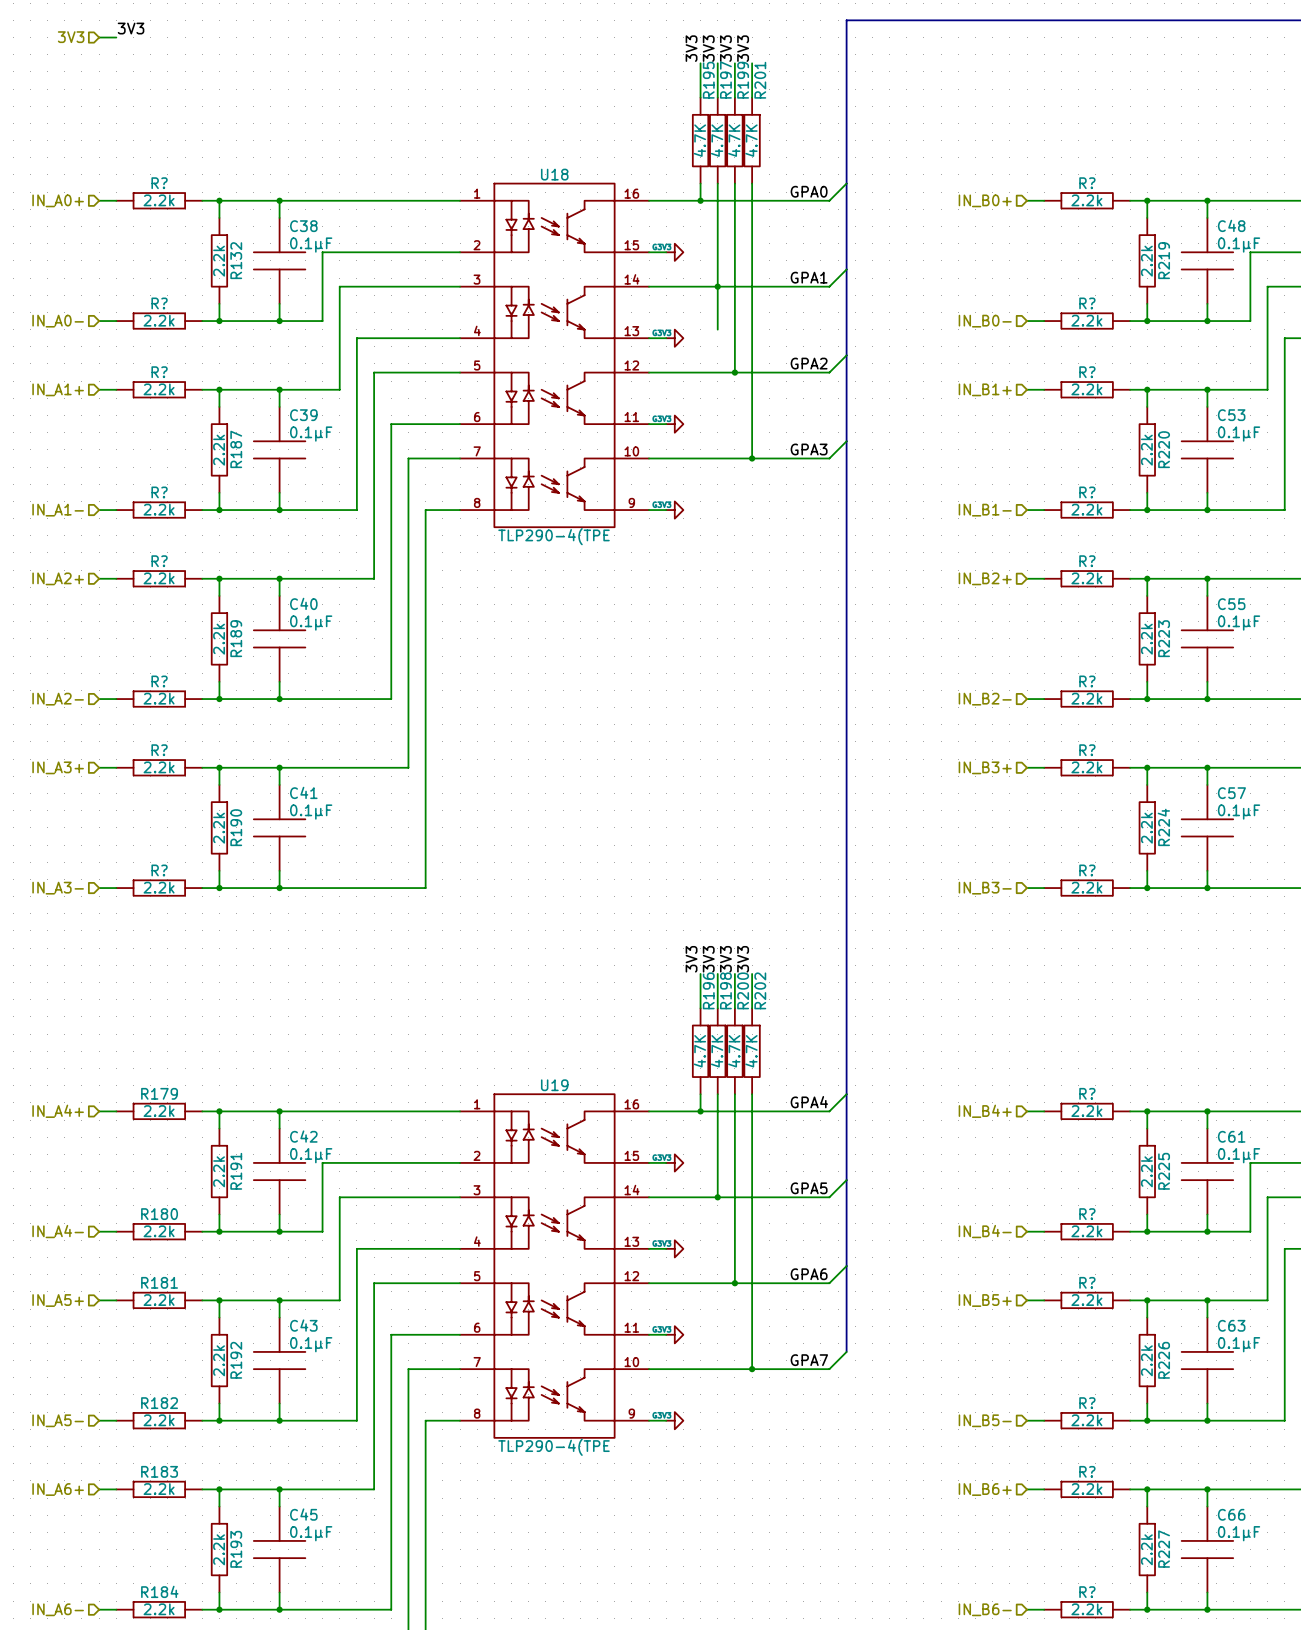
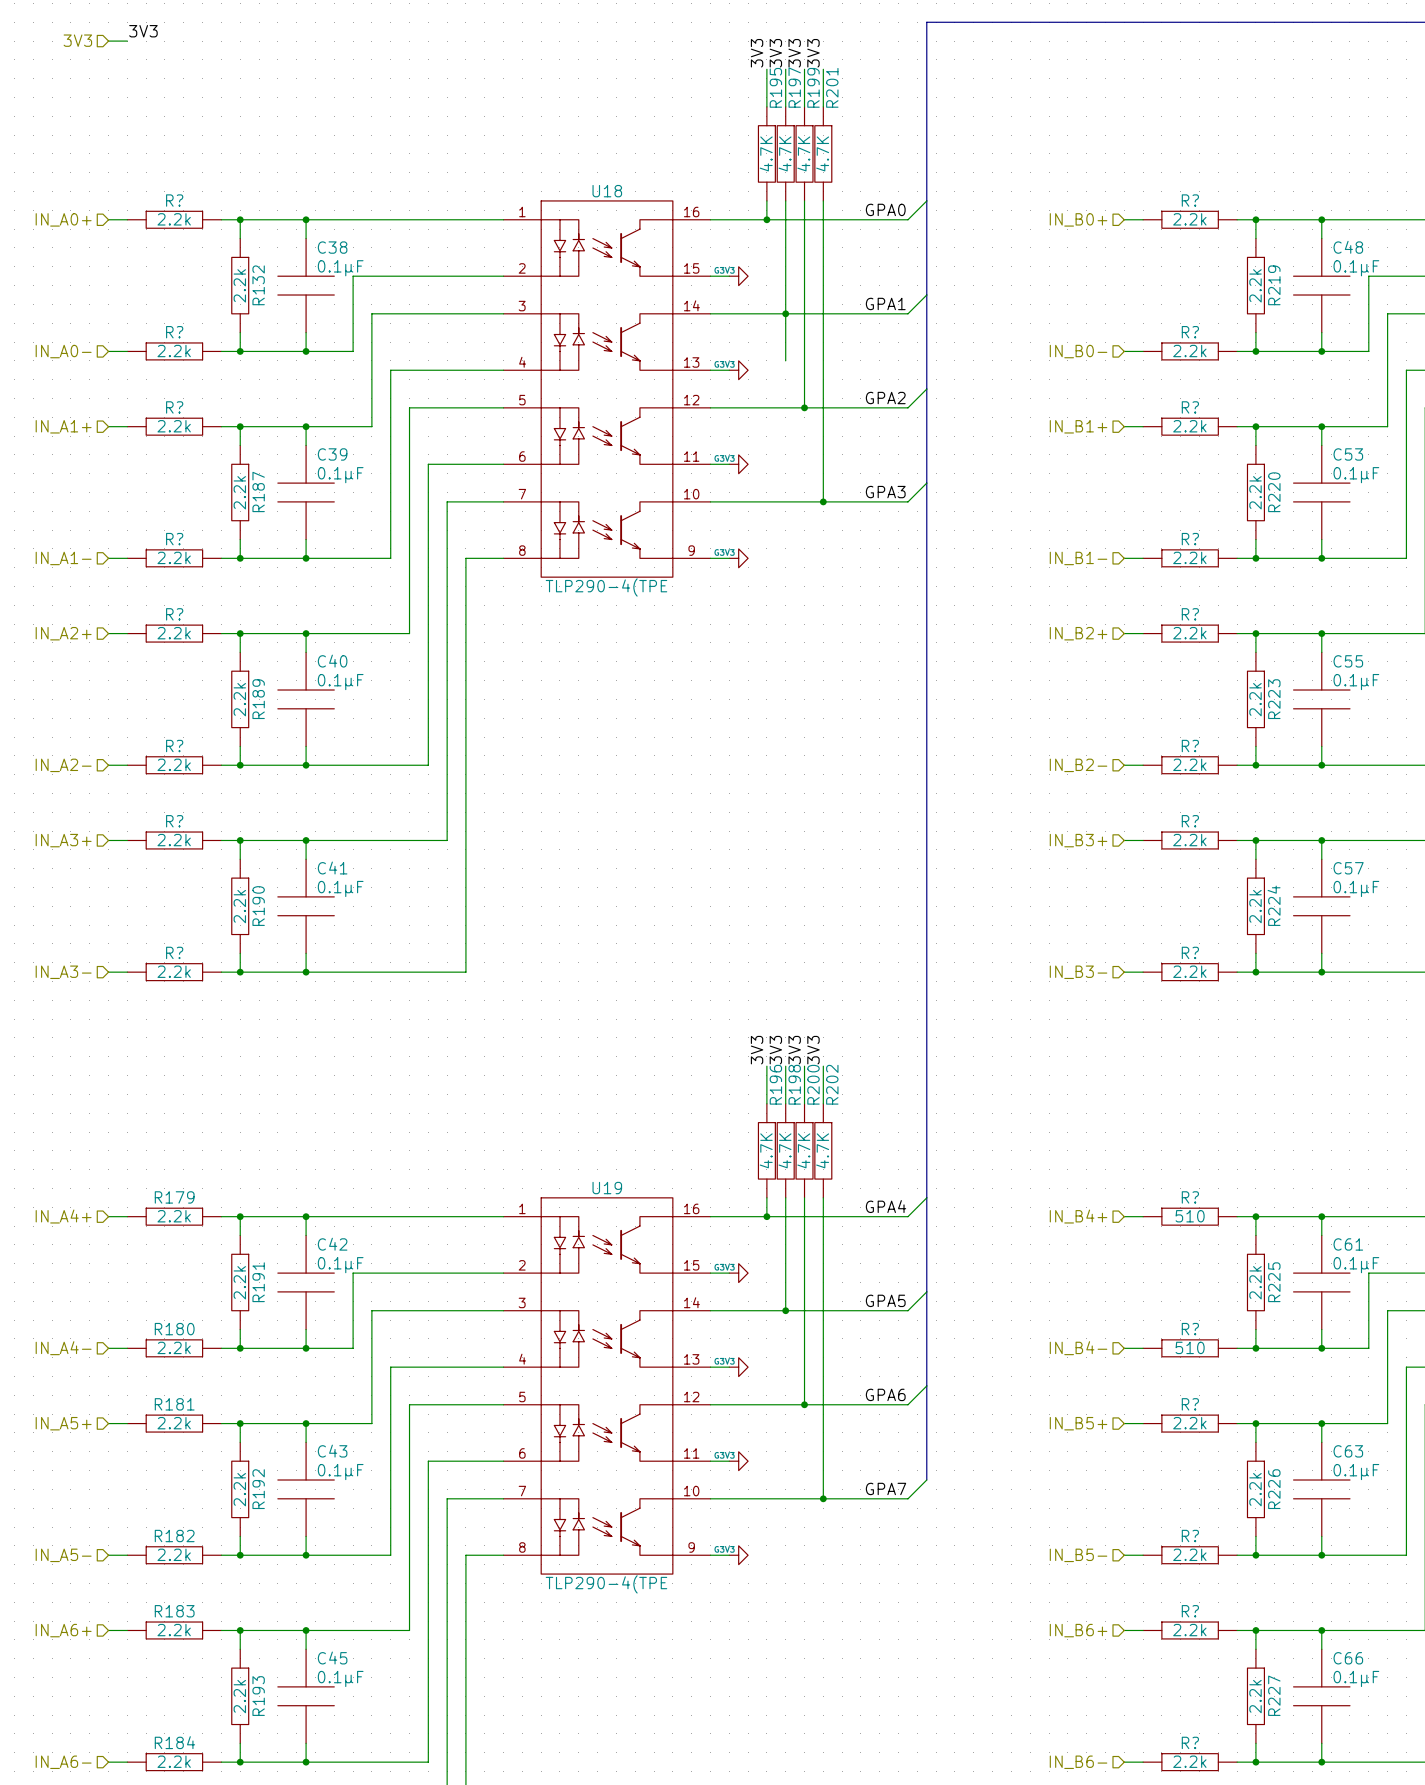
R? text: 2.2k (1086, 1111) -> 510 (1190, 1216)
R? text: 2.2k (1086, 1231) -> 510 (1190, 1347)

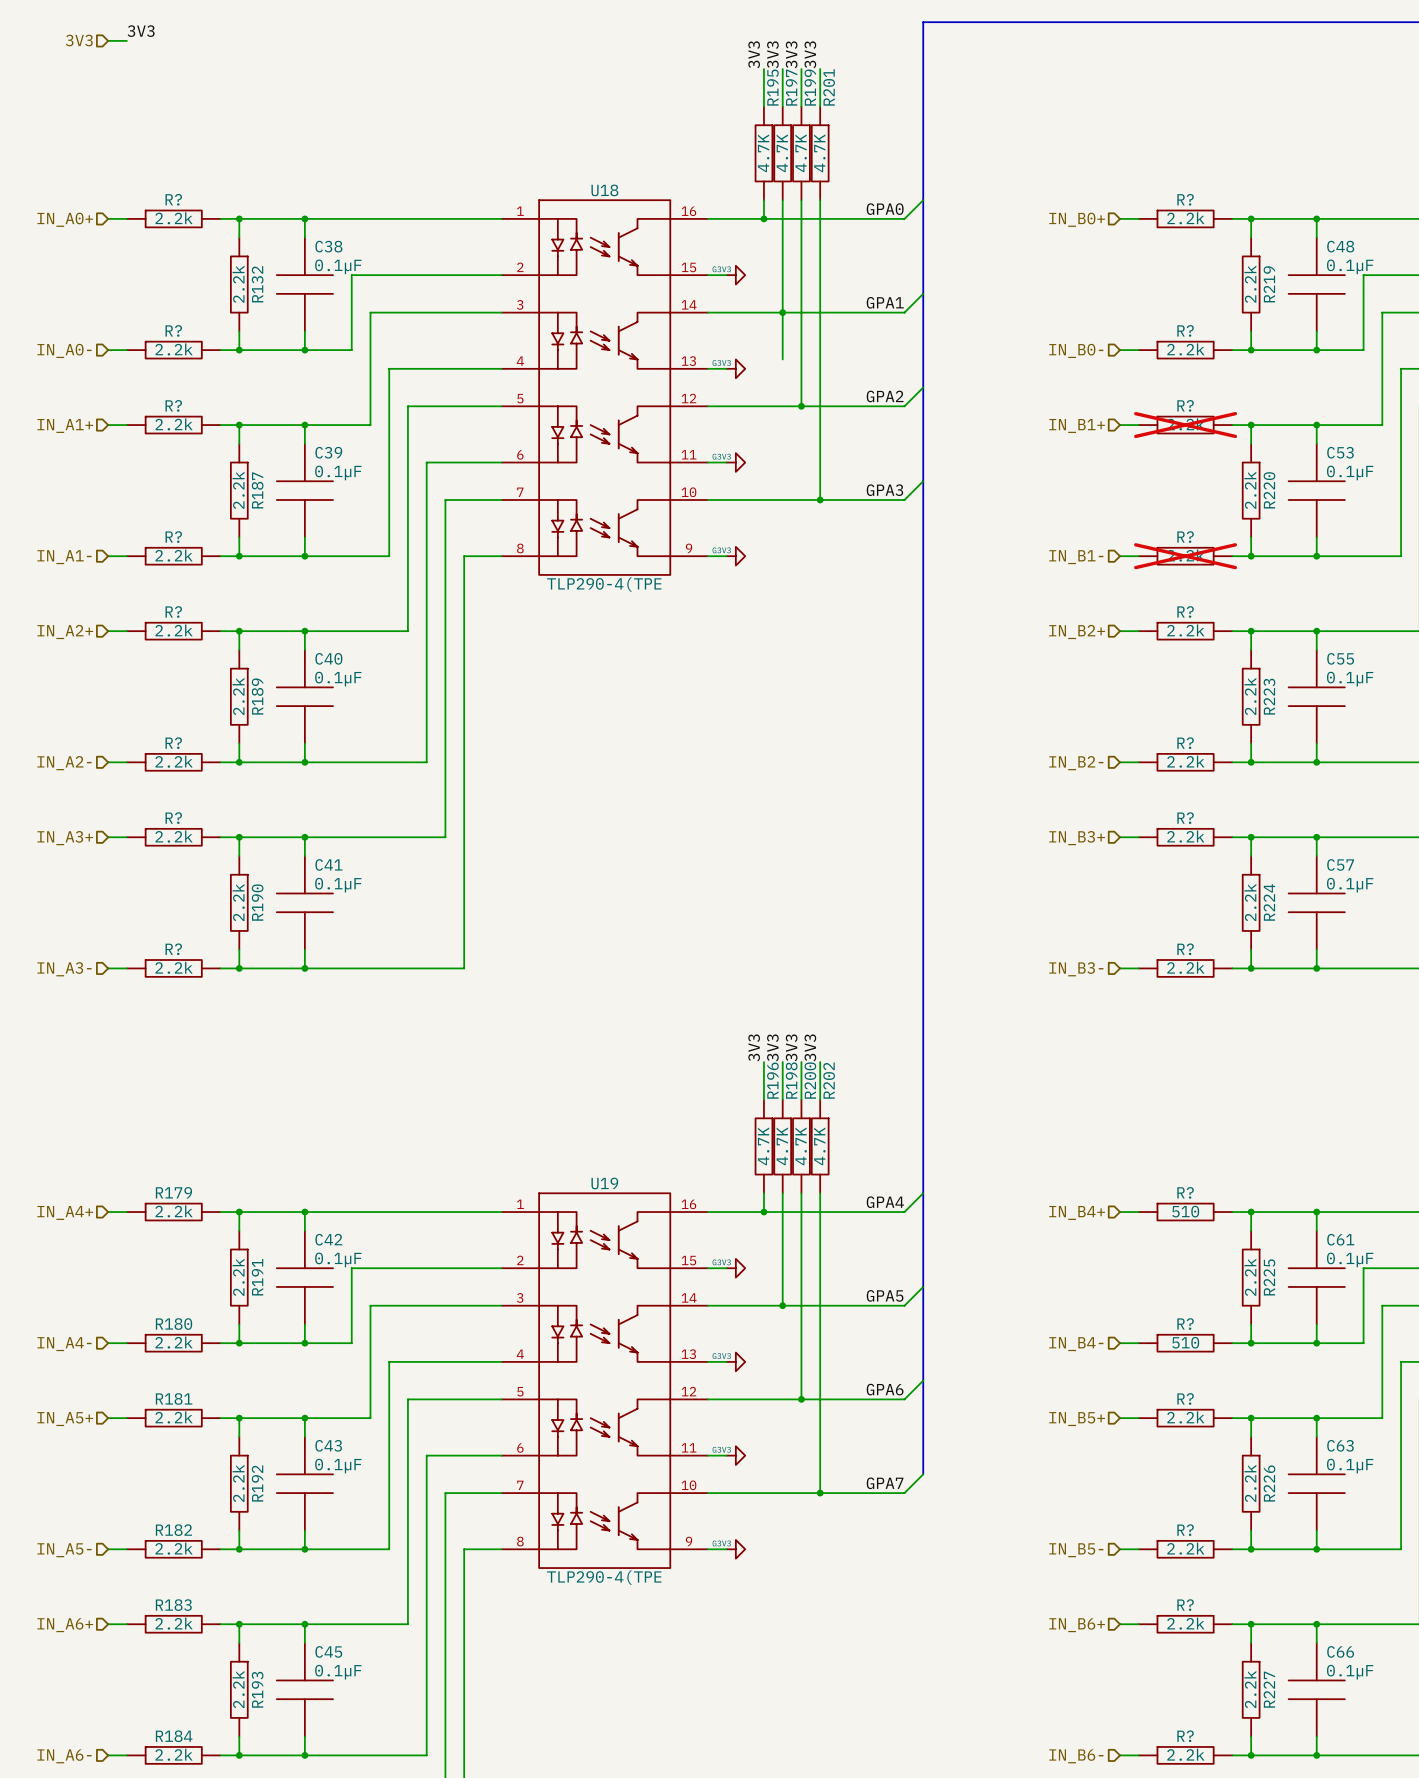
R? do-not-place cross: none -> (1185, 425)
R? do-not-place cross: none -> (1185, 556)

